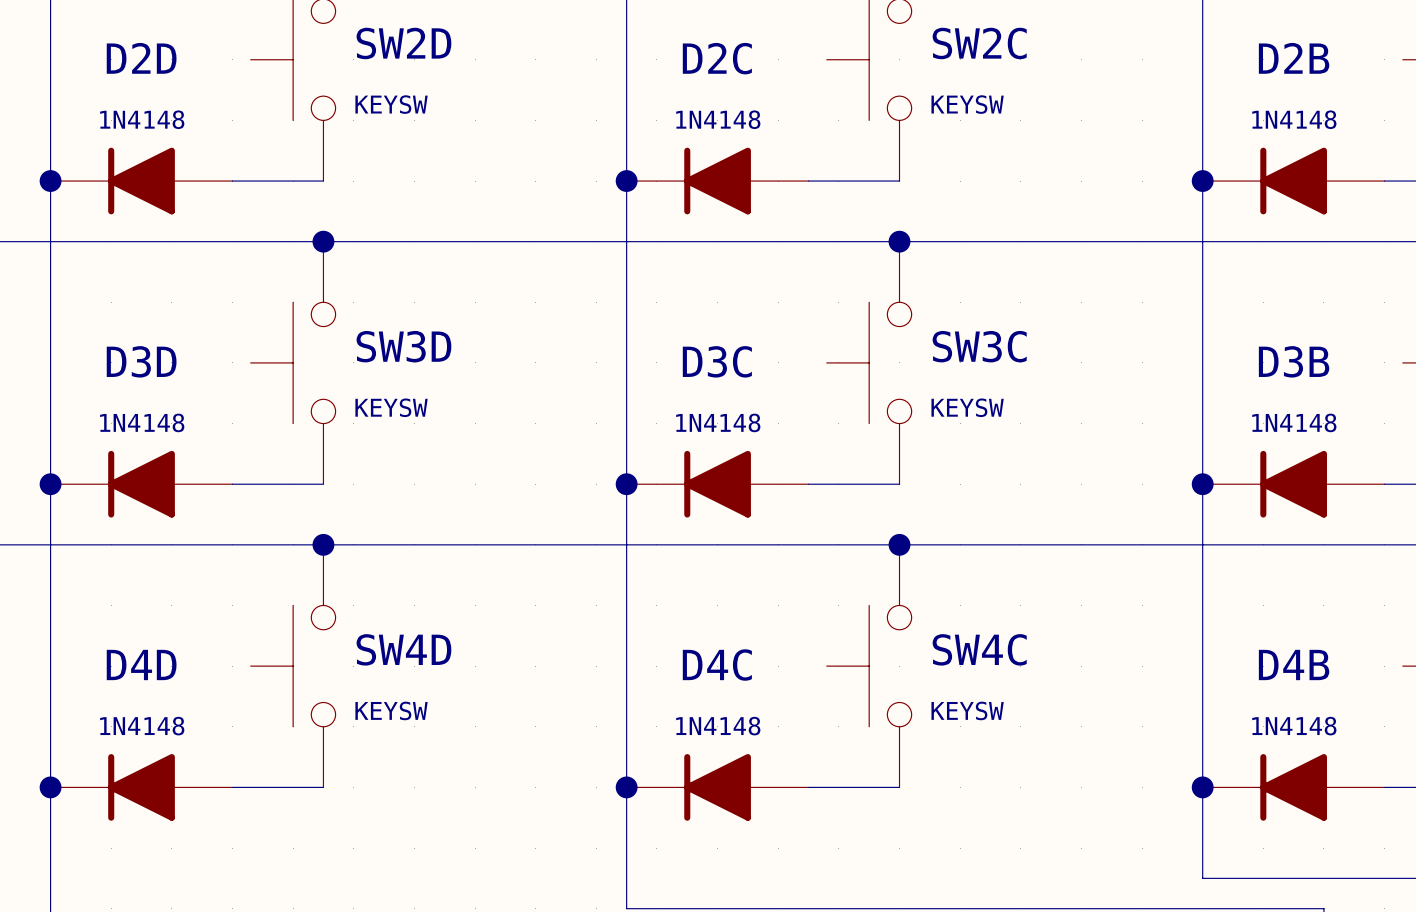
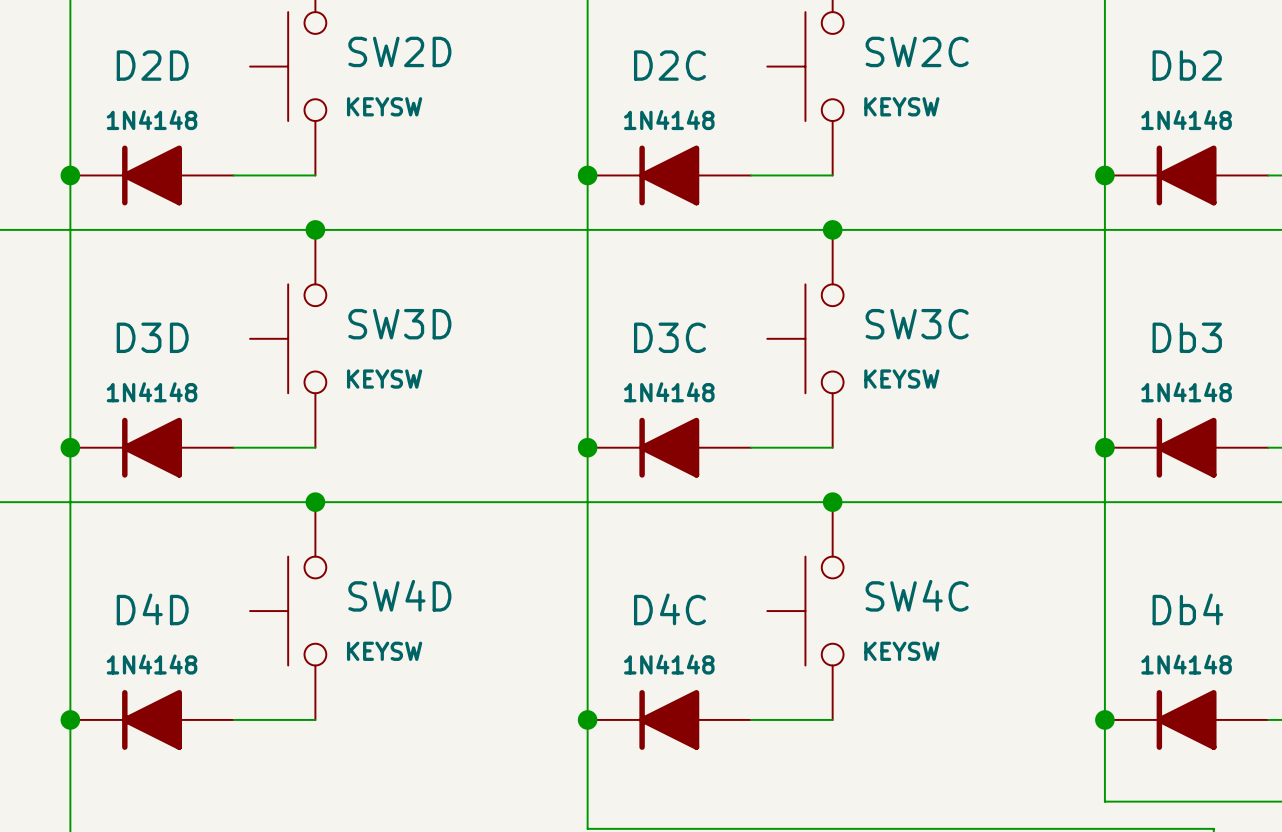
D2B name: D2B (1294, 58) -> Db2 (1187, 65)
D3B name: D3B (1294, 361) -> Db3 (1187, 337)
D4B name: D4B (1294, 664) -> Db4 (1187, 609)

